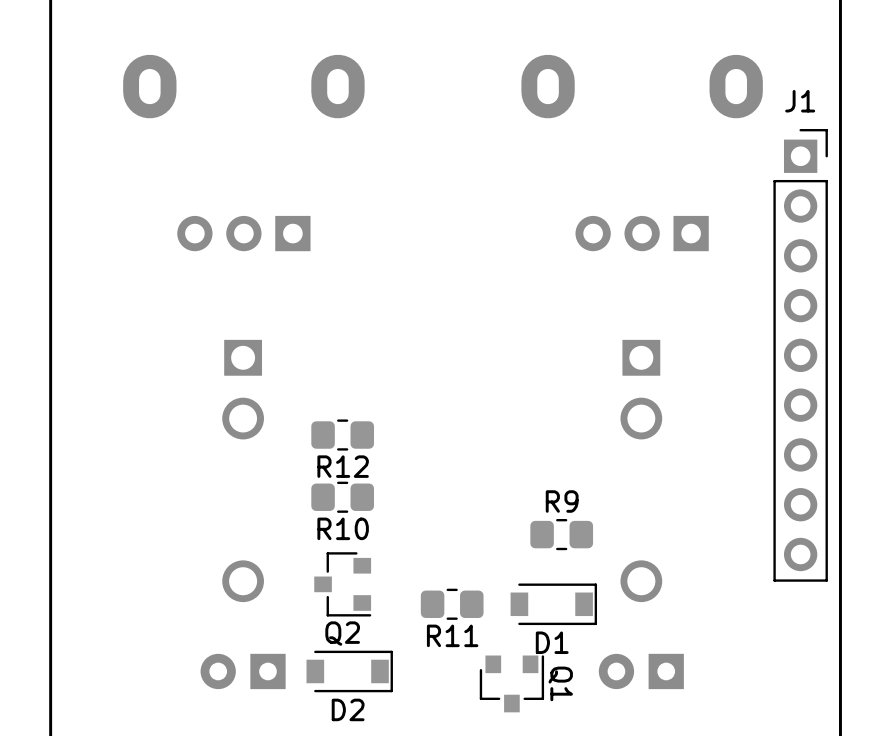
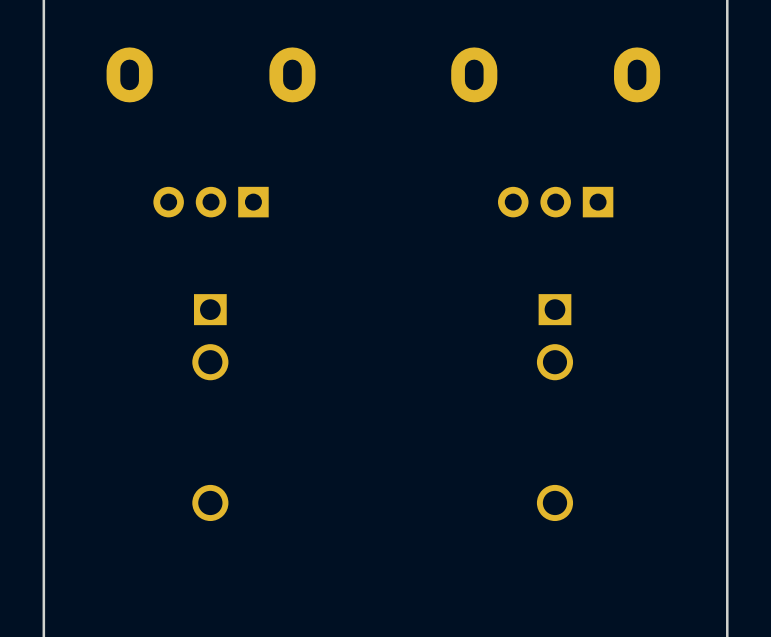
J1: (800, 355) -> none
R12: (342, 435) -> none
R10: (342, 497) -> none
R9: (561, 534) -> none
Q2: (342, 584) -> none
R11: (452, 604) -> none
D1: (553, 604) -> none
part: (243, 671) -> none
D2: (349, 671) -> none
part: (641, 671) -> none
Q1: (511, 683) -> none

